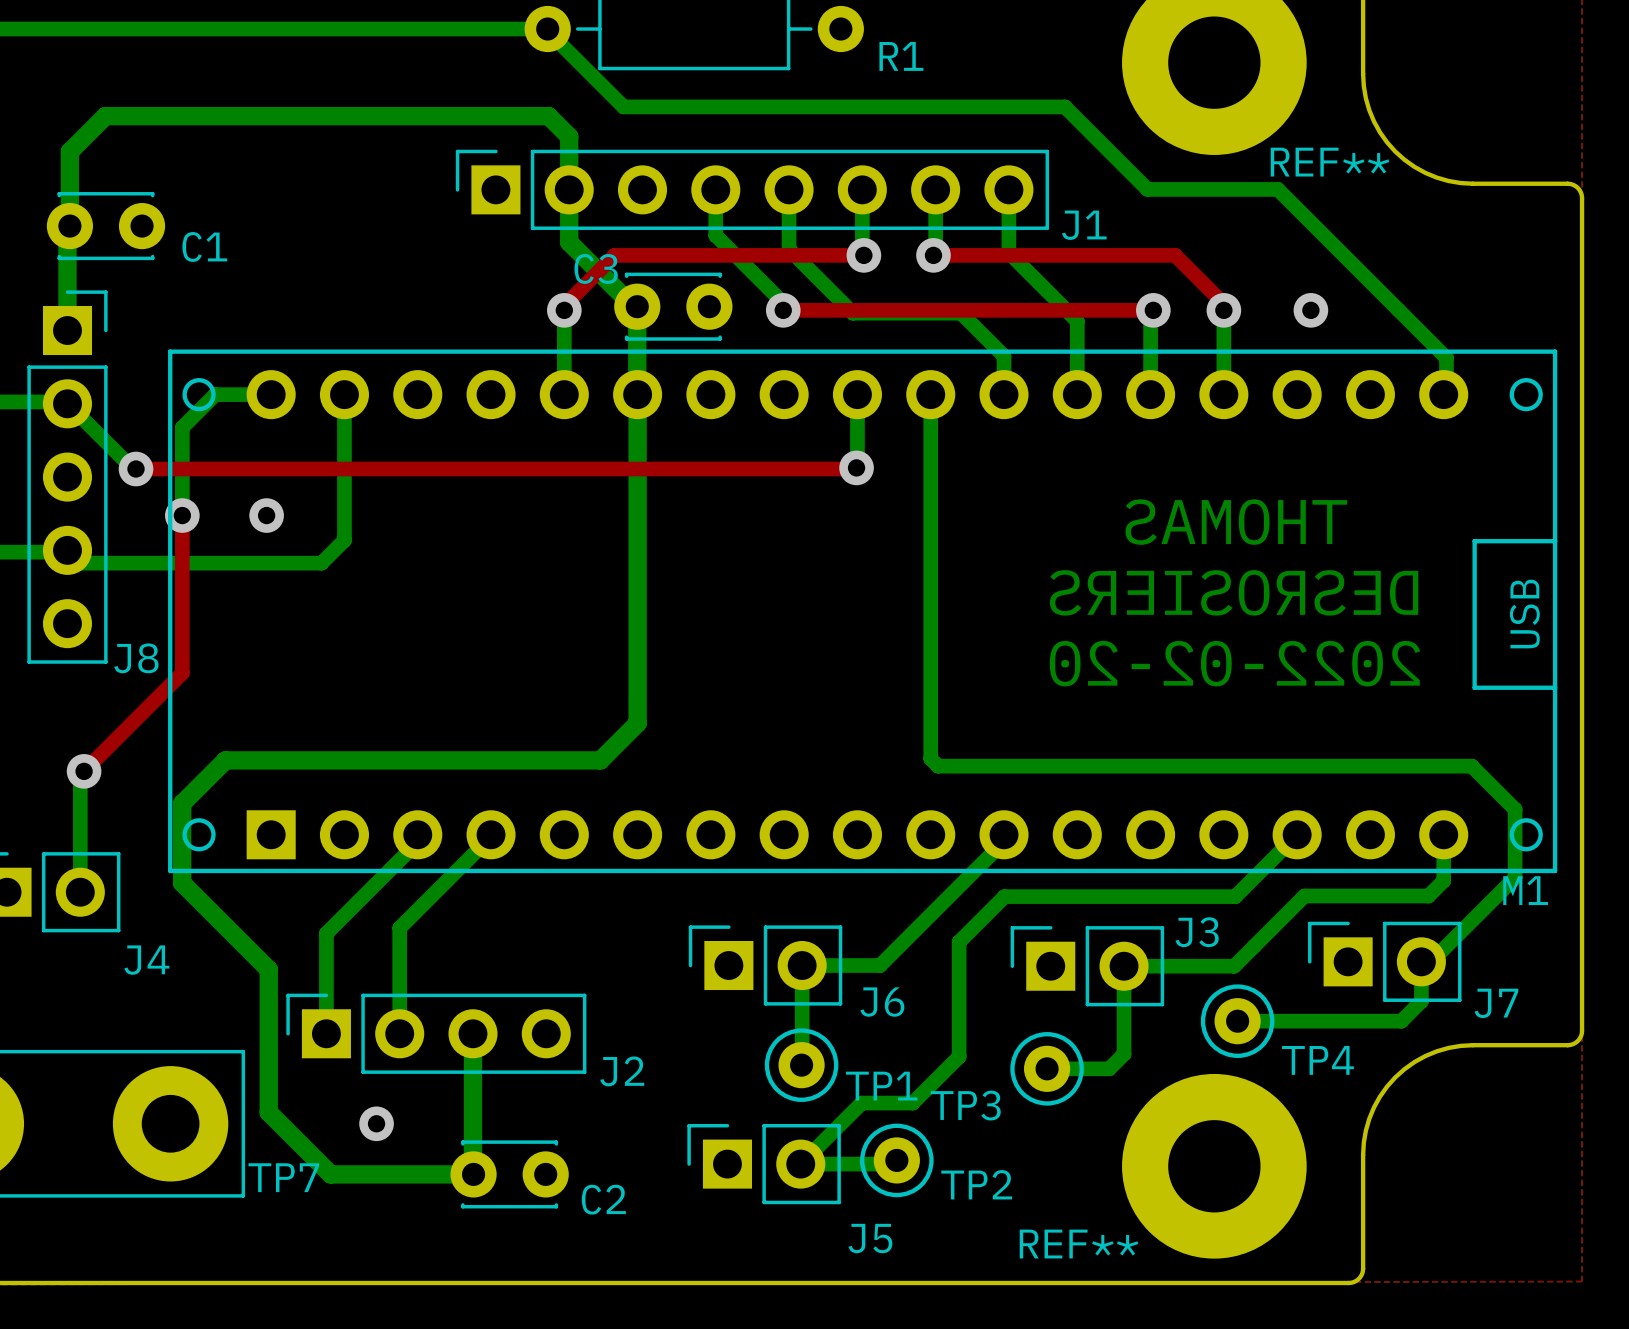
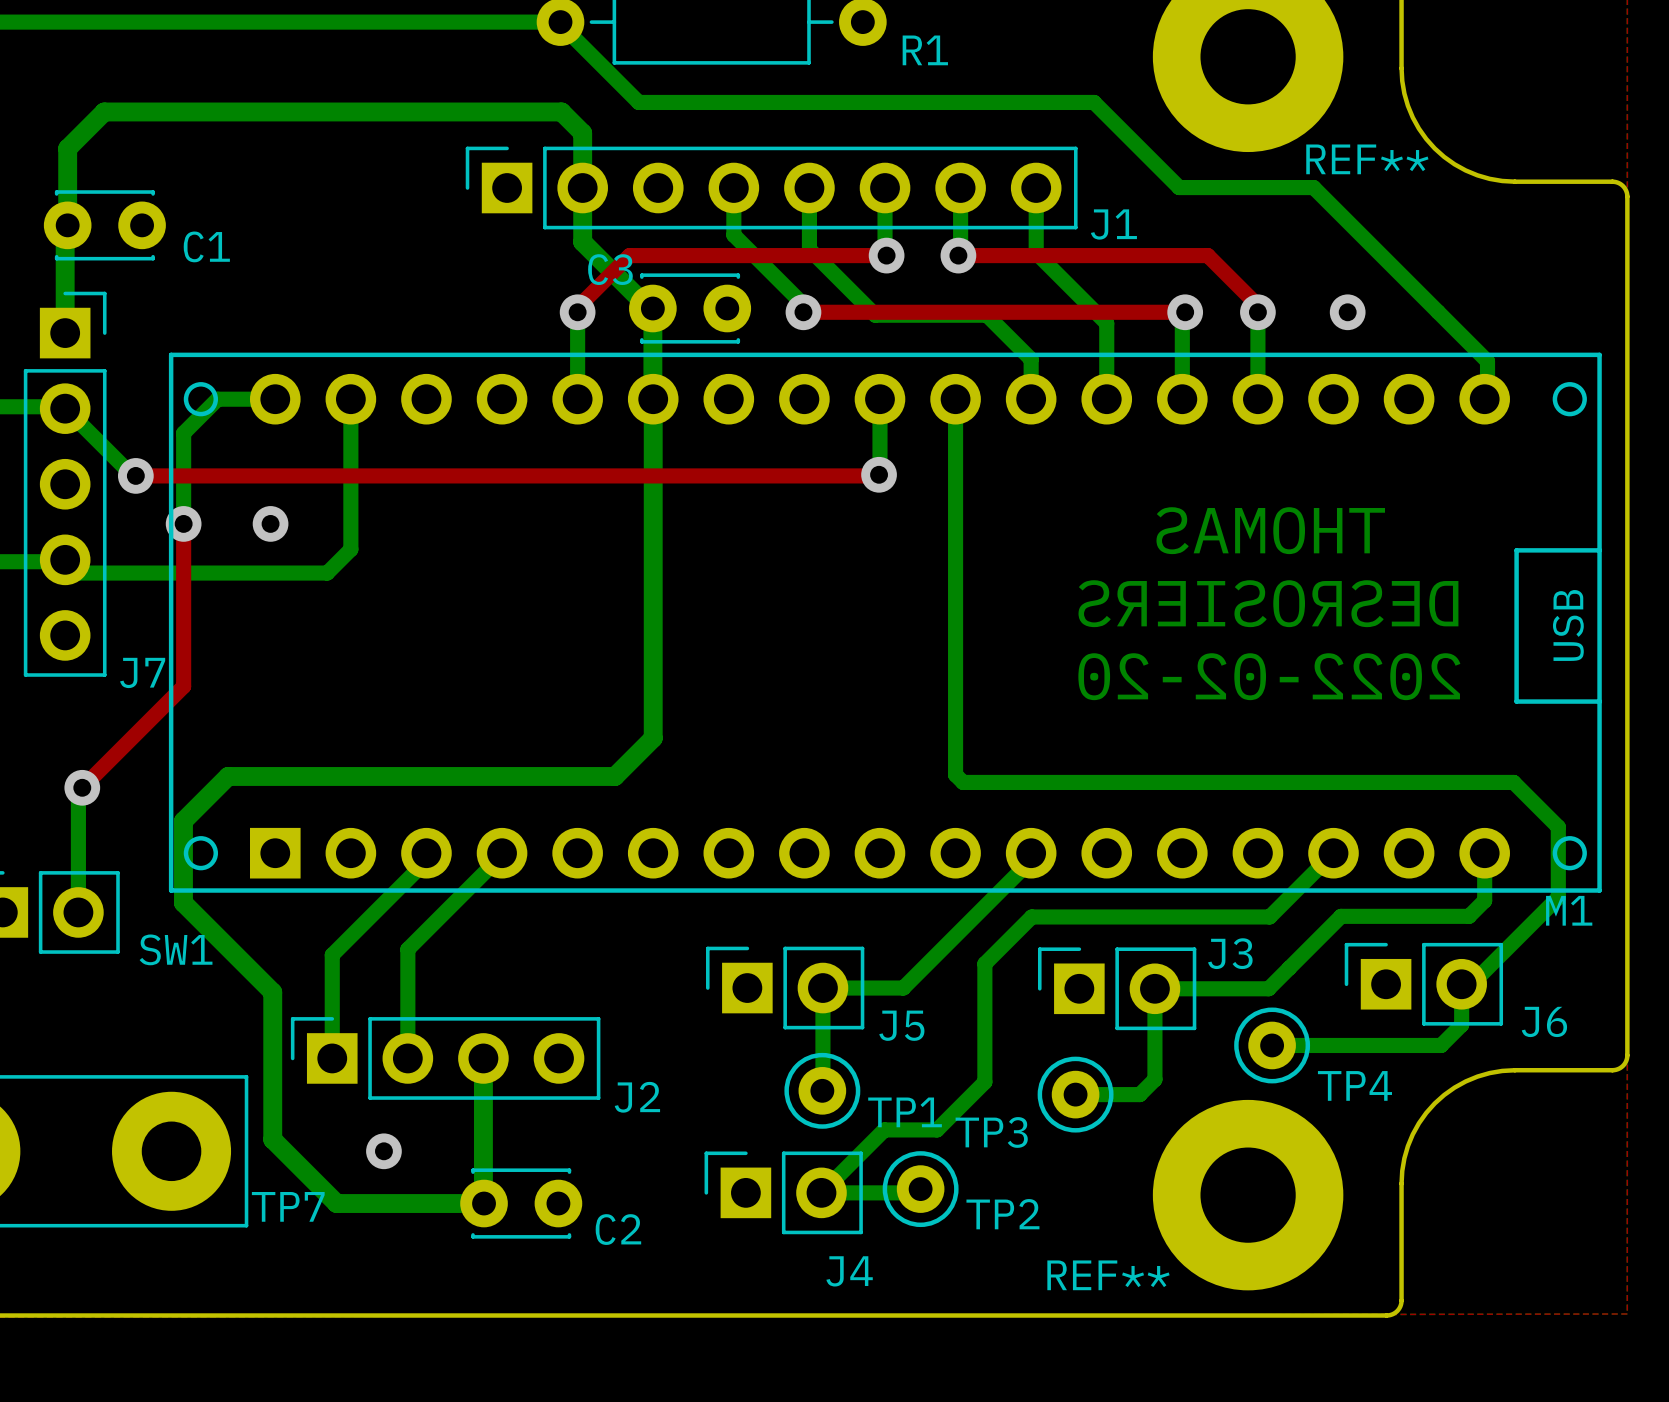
J8 name: J8 (136, 658) -> J7 (142, 672)
J4 name: J4 (146, 960) -> SW1 (176, 949)
J6 name: J6 (882, 1002) -> J5 (901, 1025)
J7 name: J7 (1496, 1003) -> J6 (1544, 1021)
J5 name: J5 (870, 1238) -> J4 (849, 1271)

